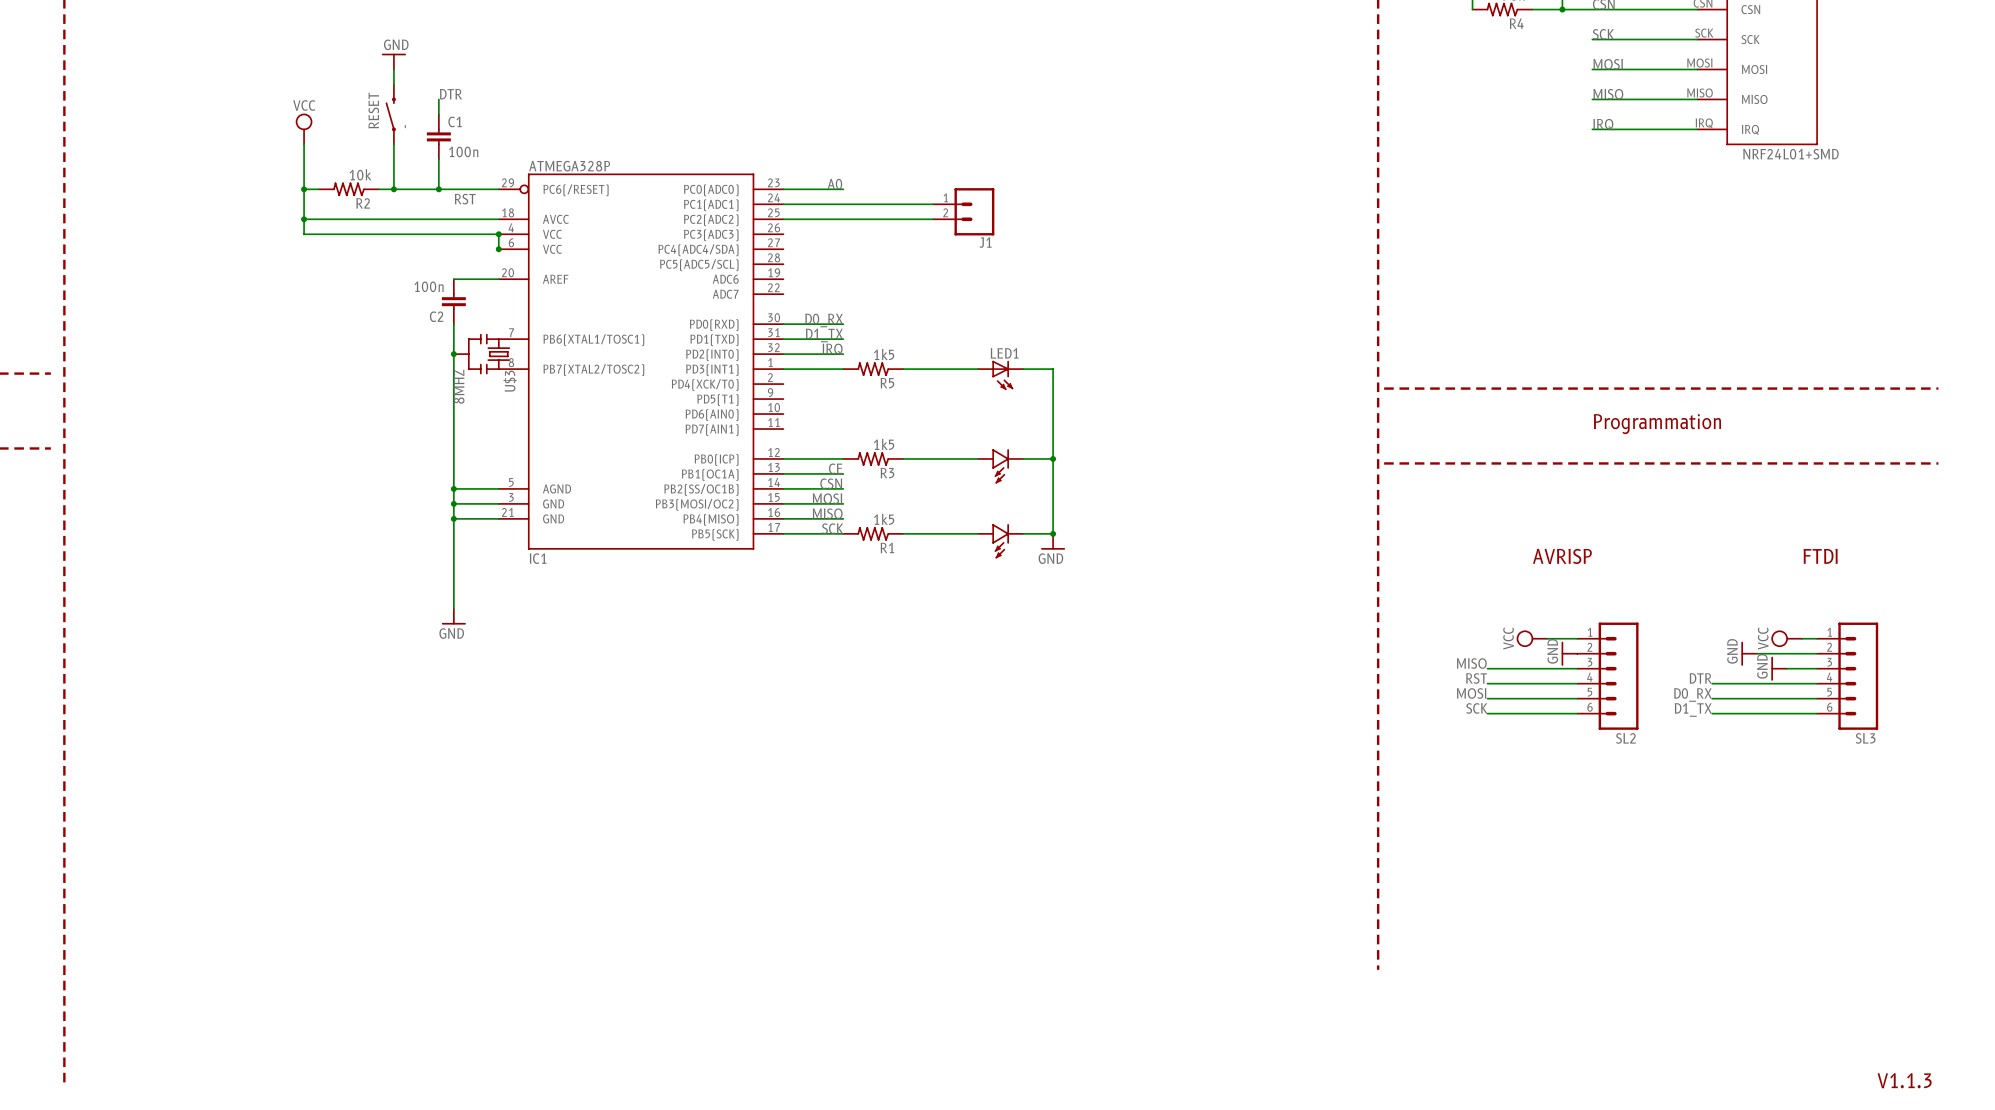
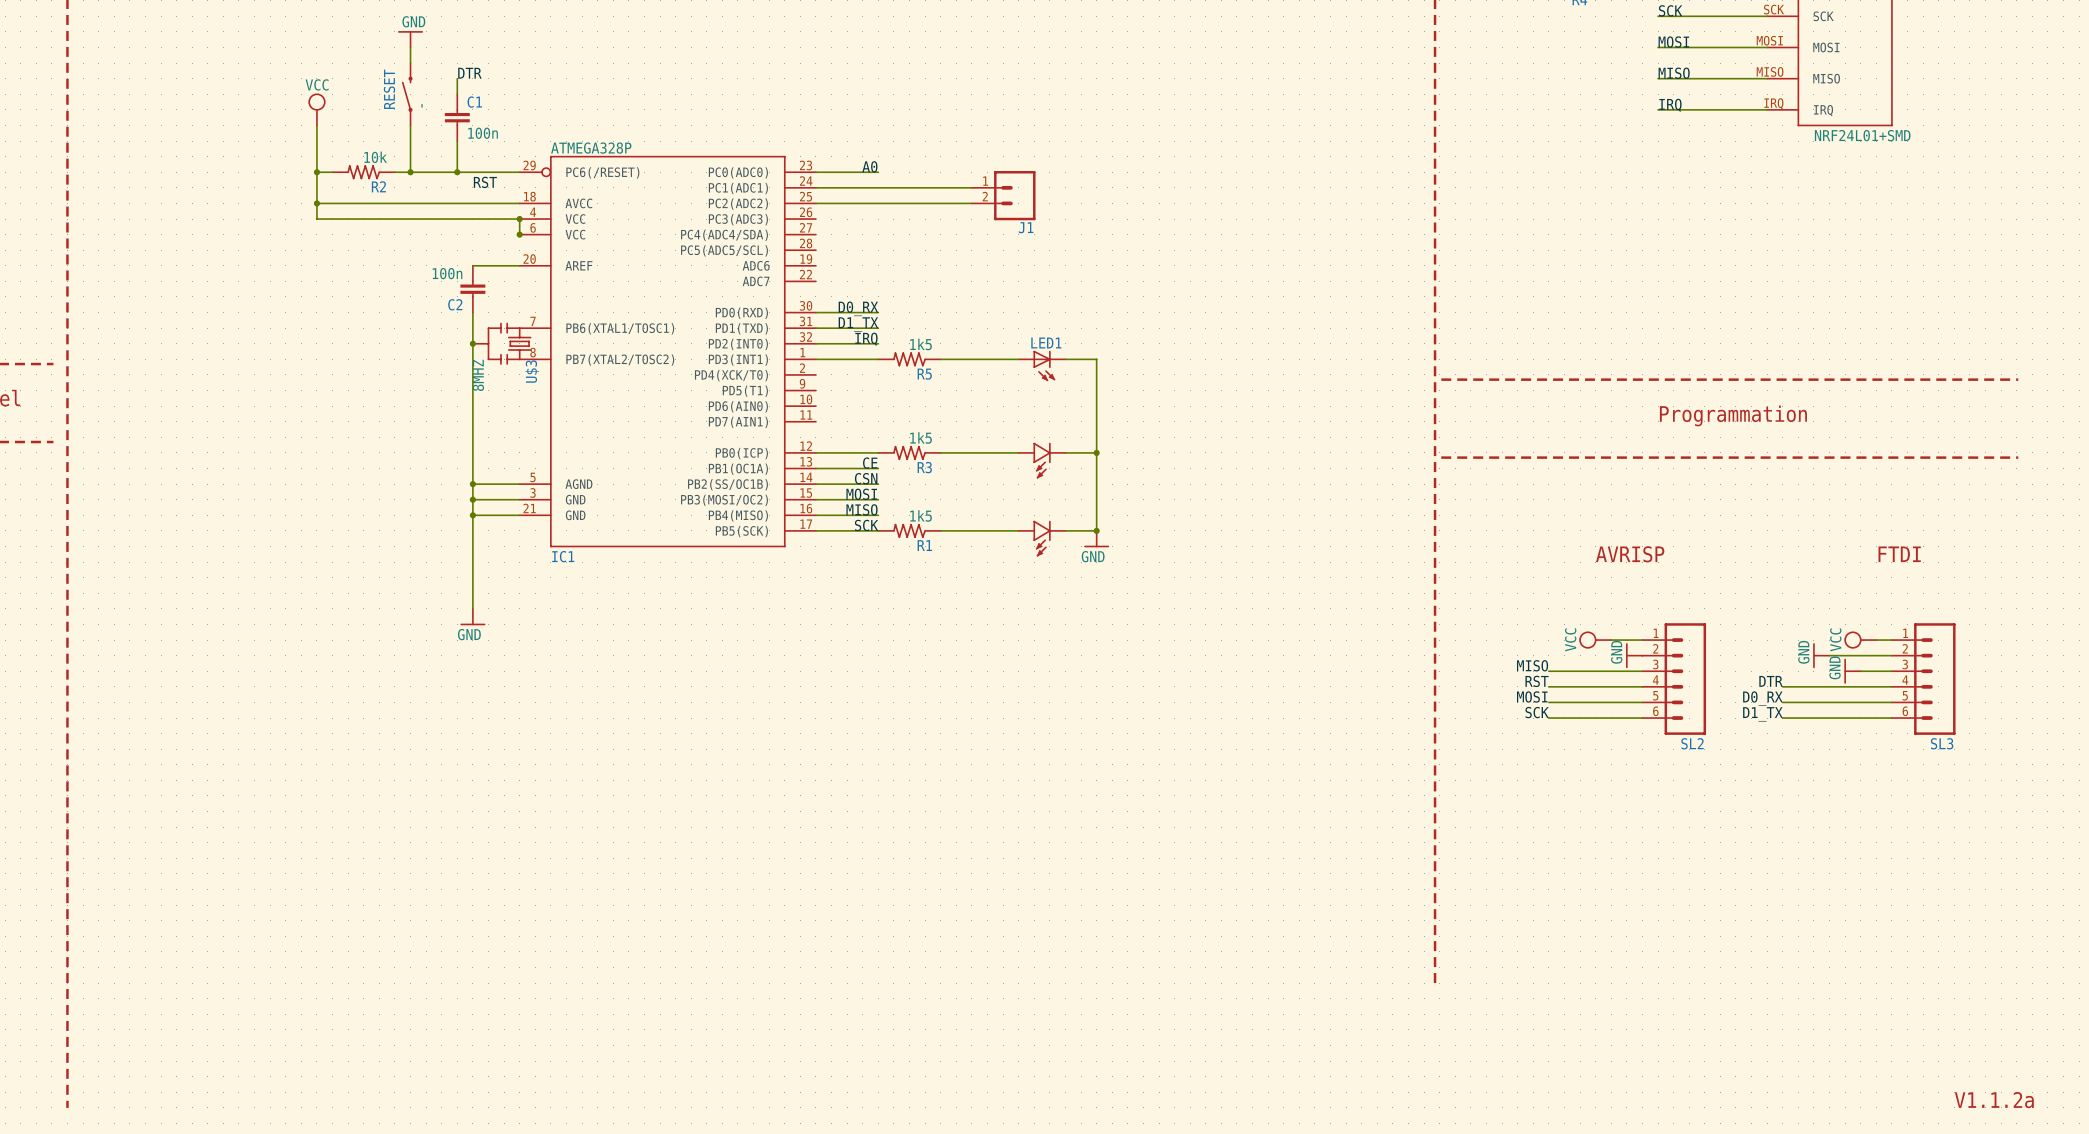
text: V1.1.3 (1904, 1080) -> V1.1.2a (1994, 1100)

